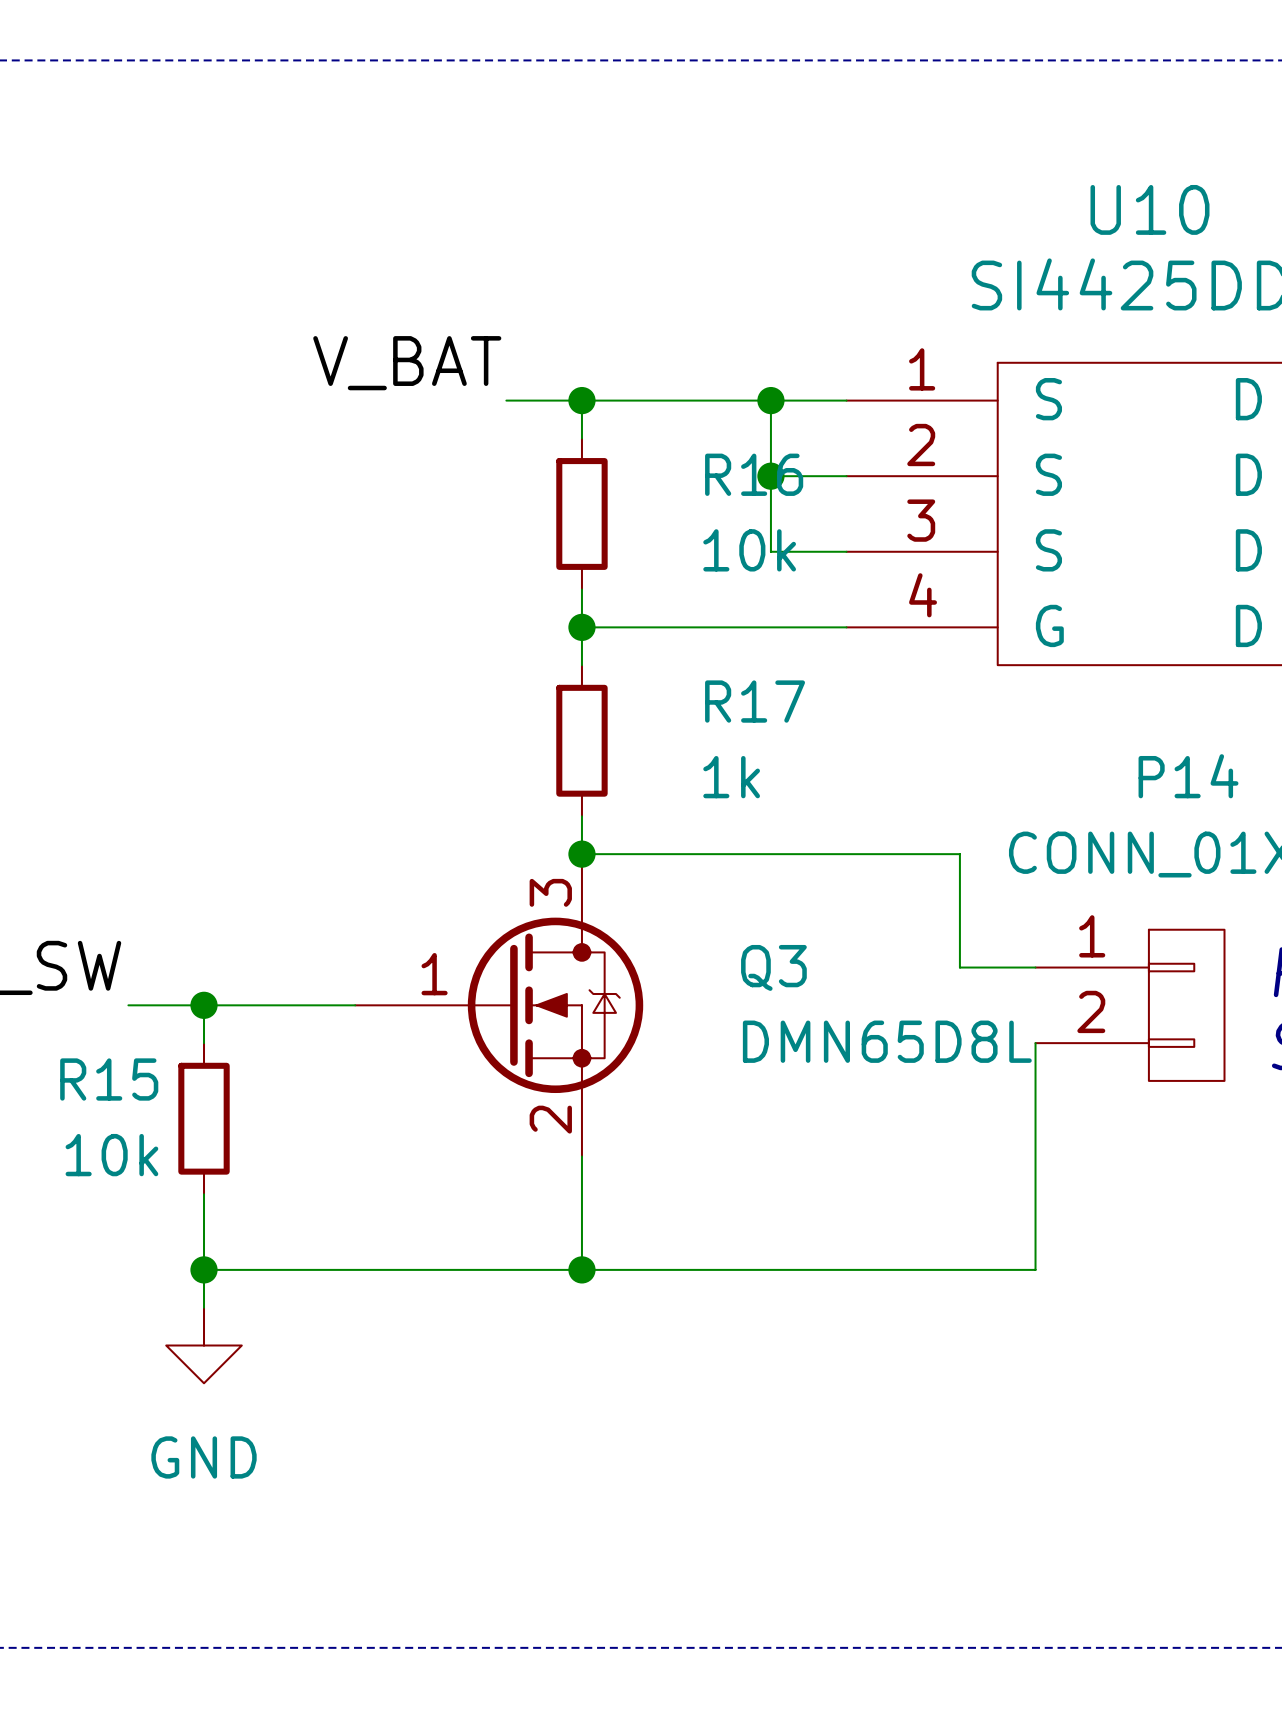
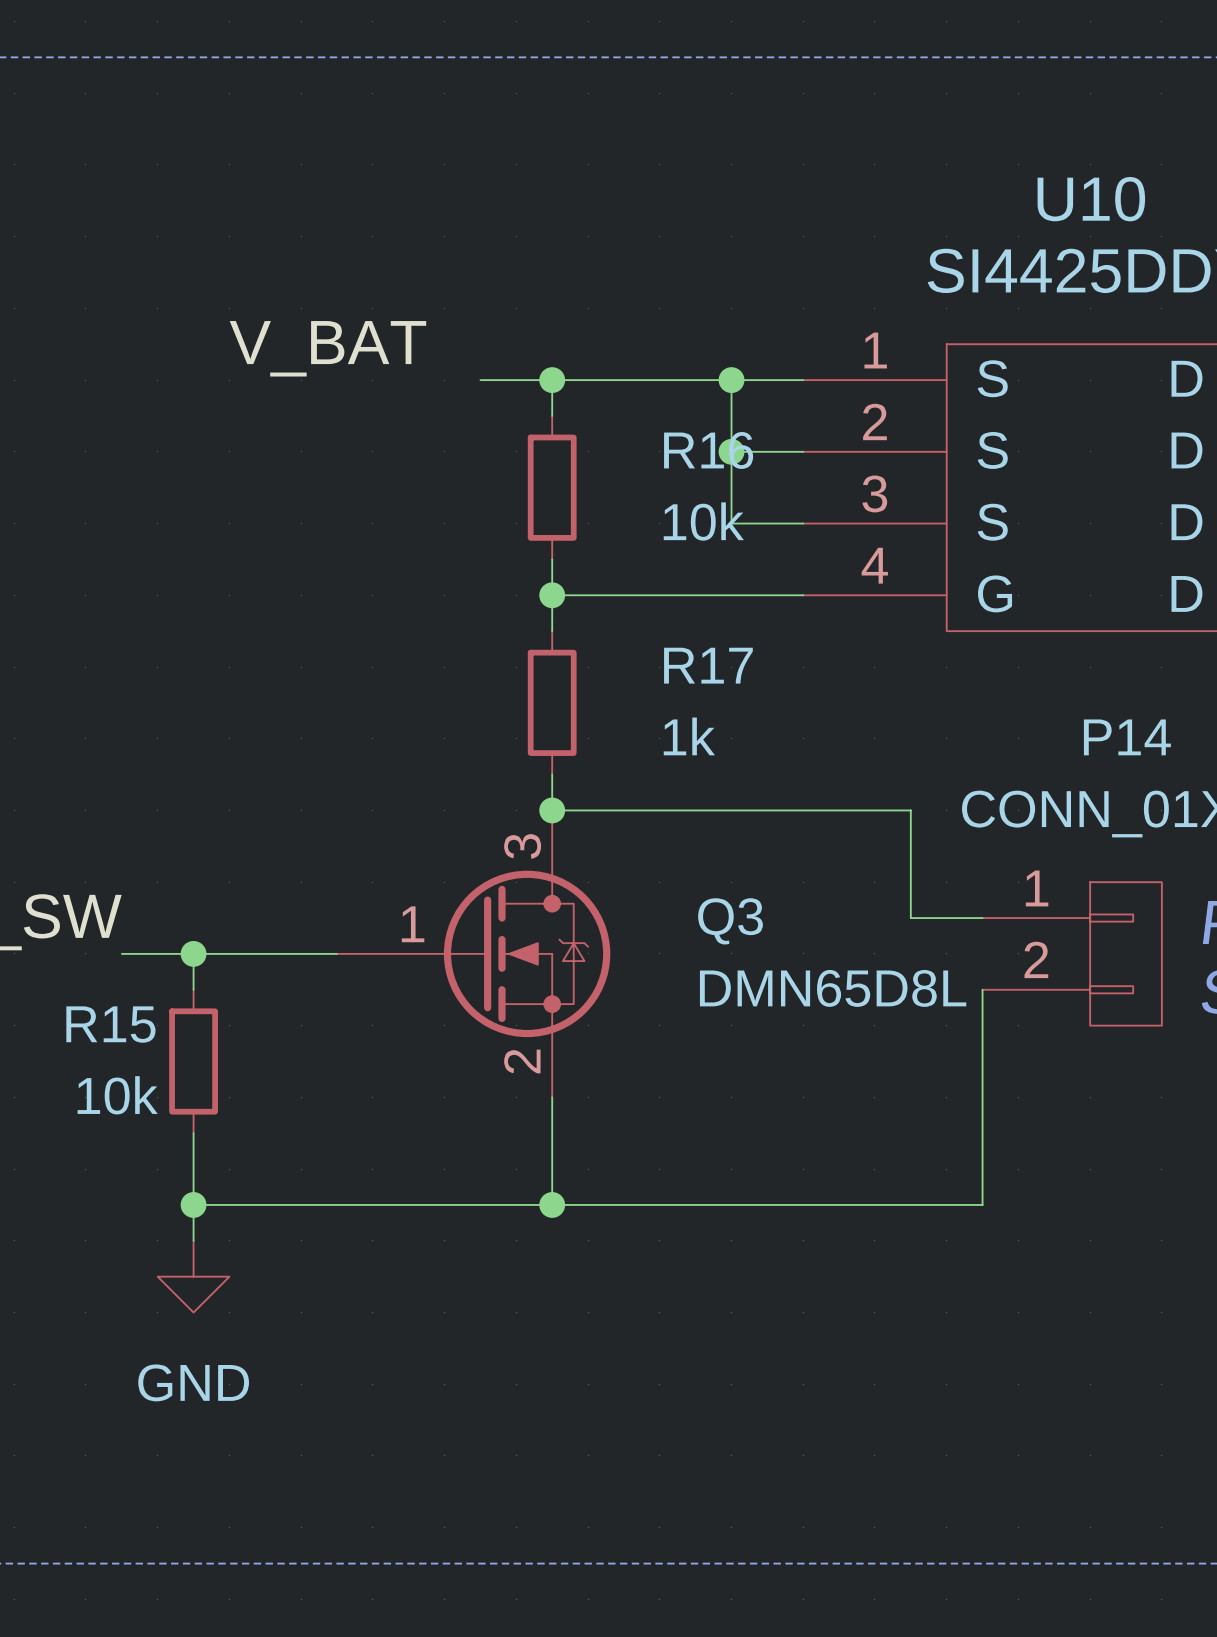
label position: V_BAT (407, 363) -> V_BAT (327, 348)

